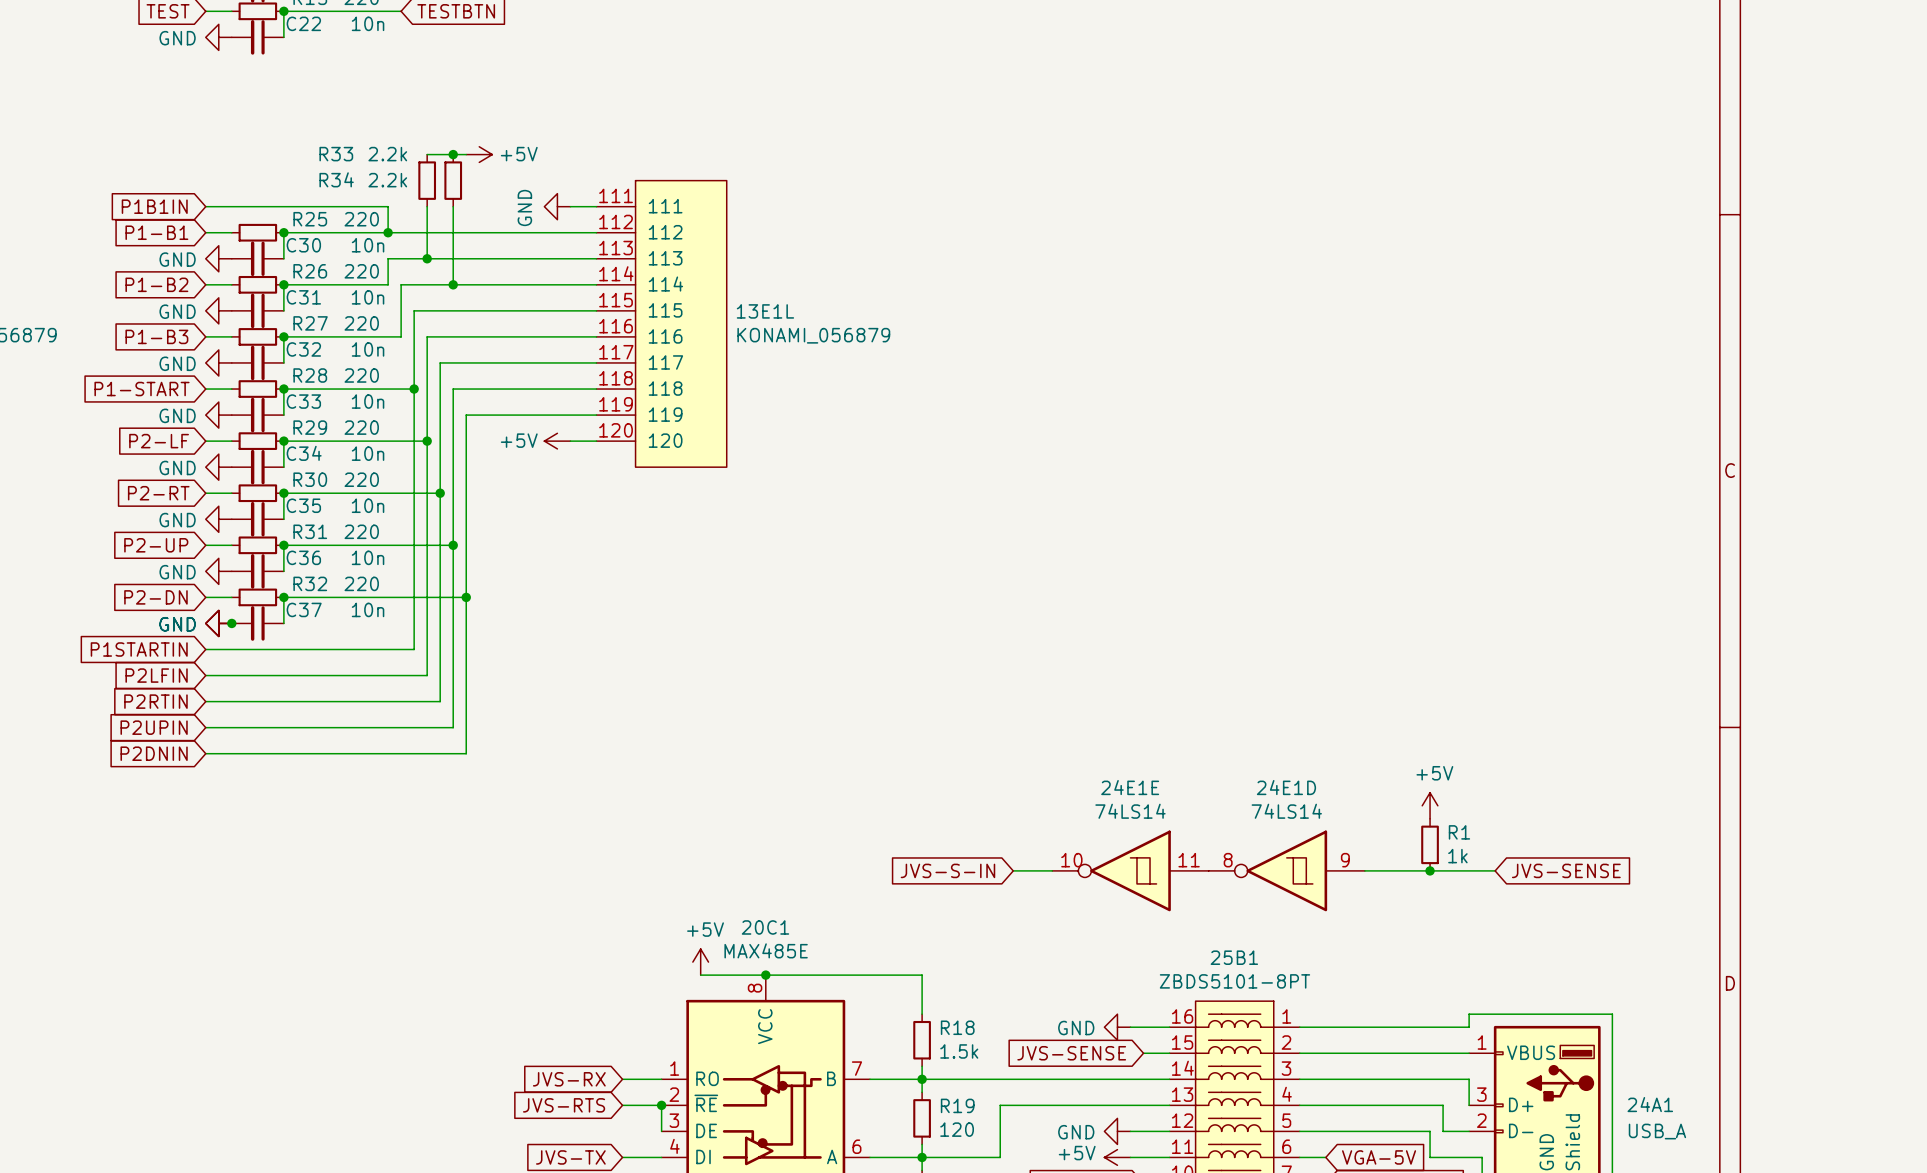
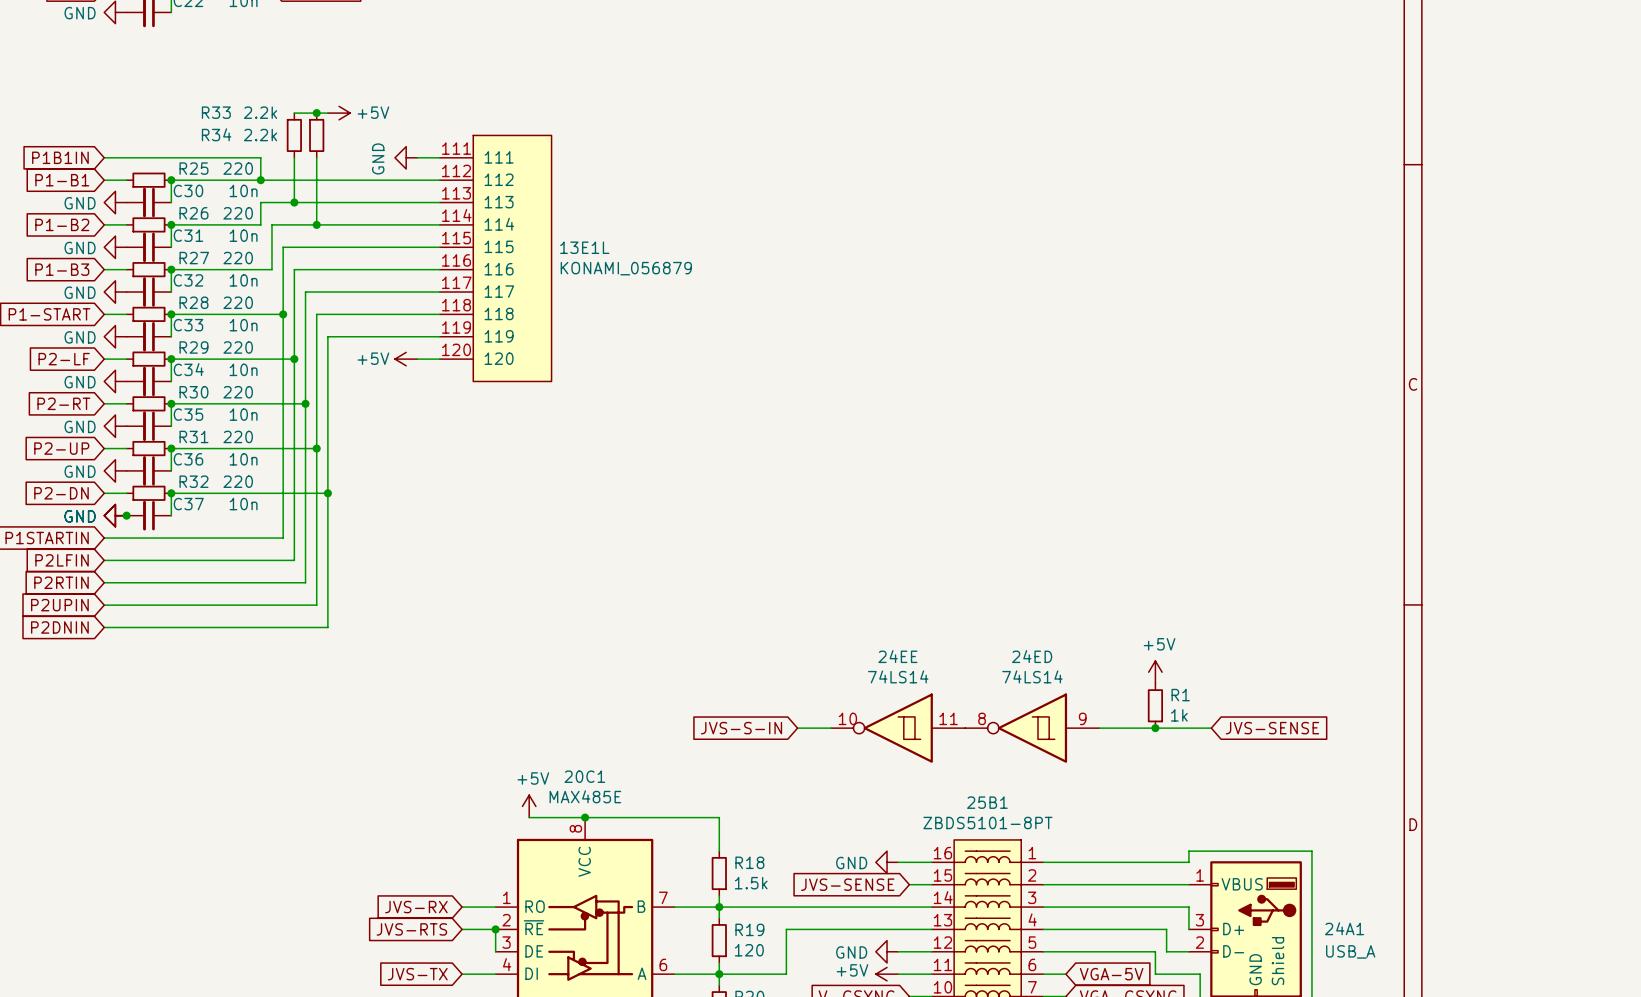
24E1E name: 24E1E (1130, 787) -> 24EE (897, 656)
24E1D name: 24E1D (1286, 787) -> 24ED (1032, 656)

